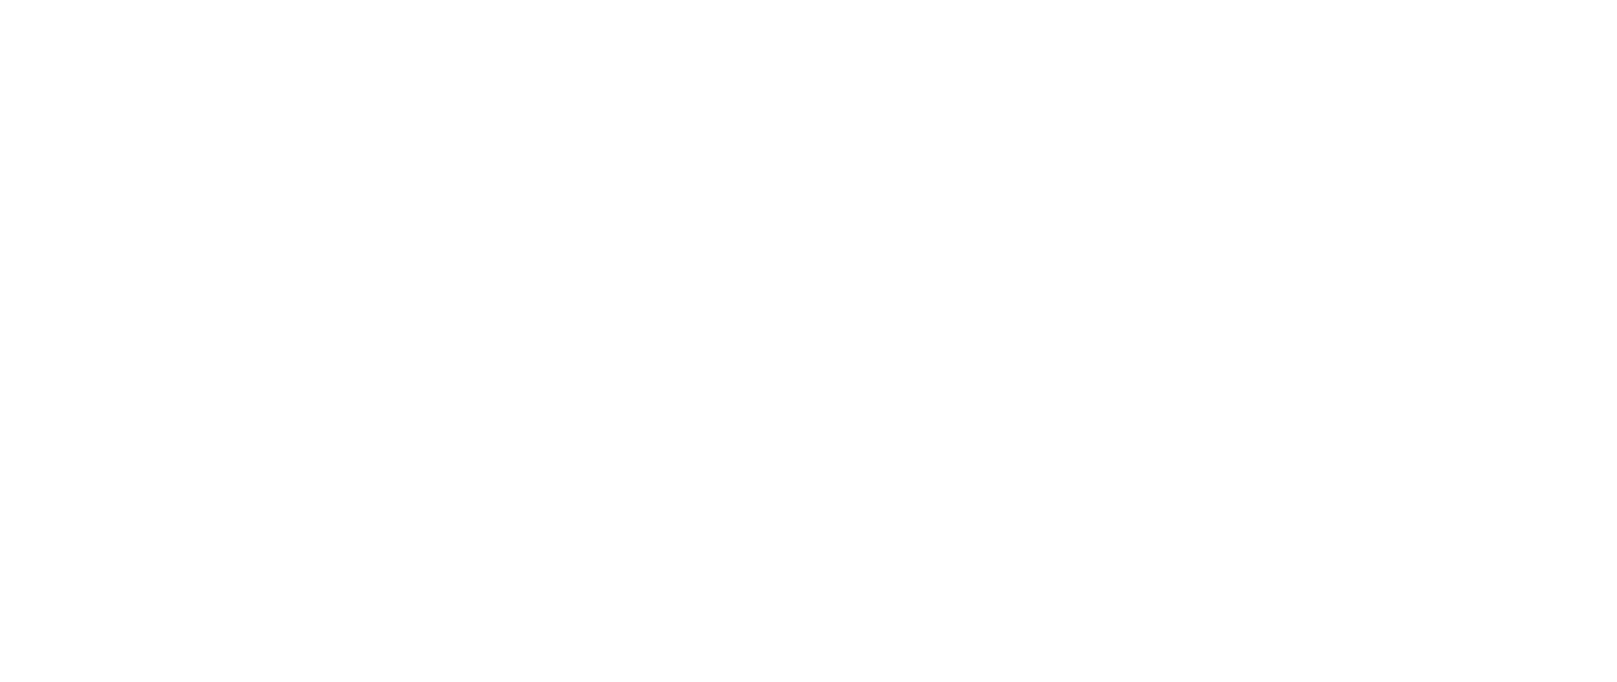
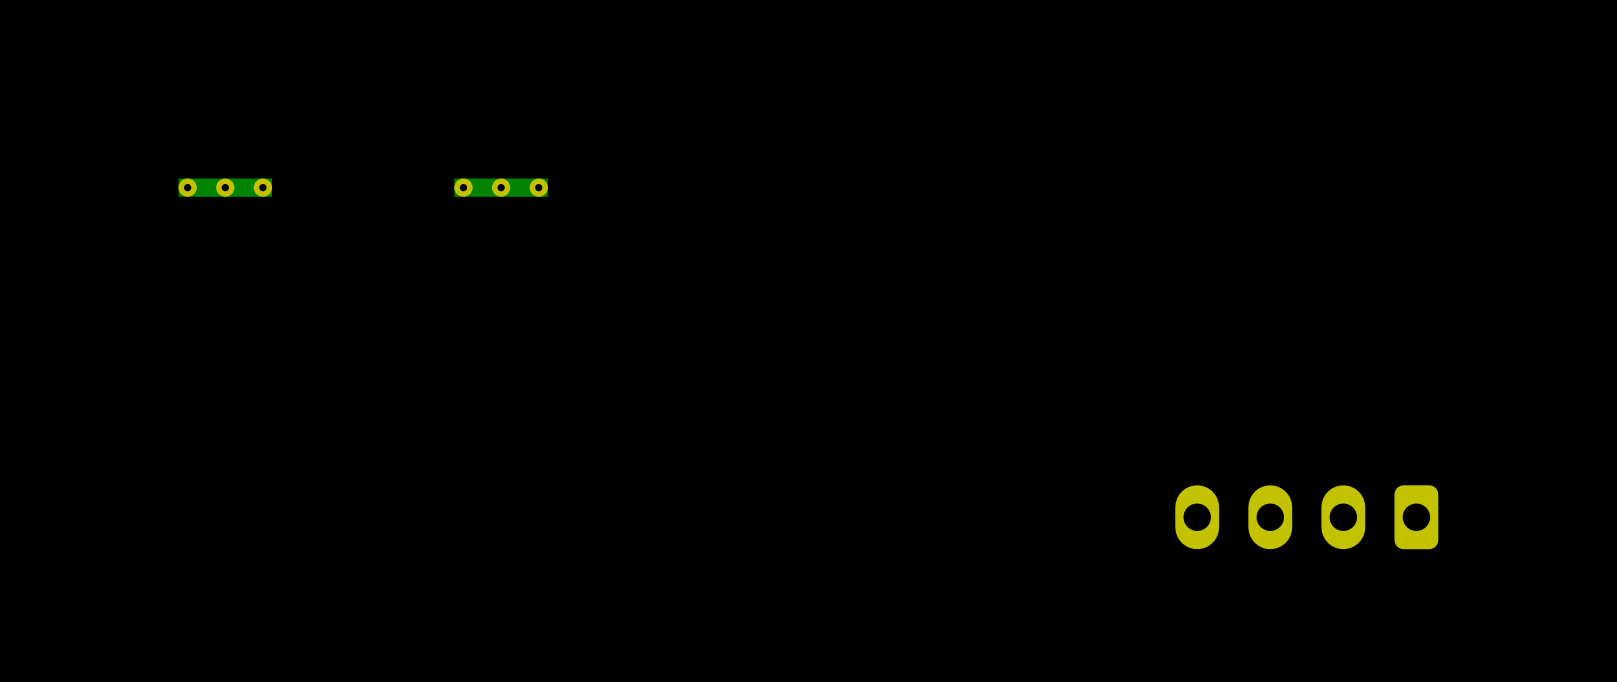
part: none -> (225, 187)
part: none -> (501, 187)
part: none -> (1306, 517)

